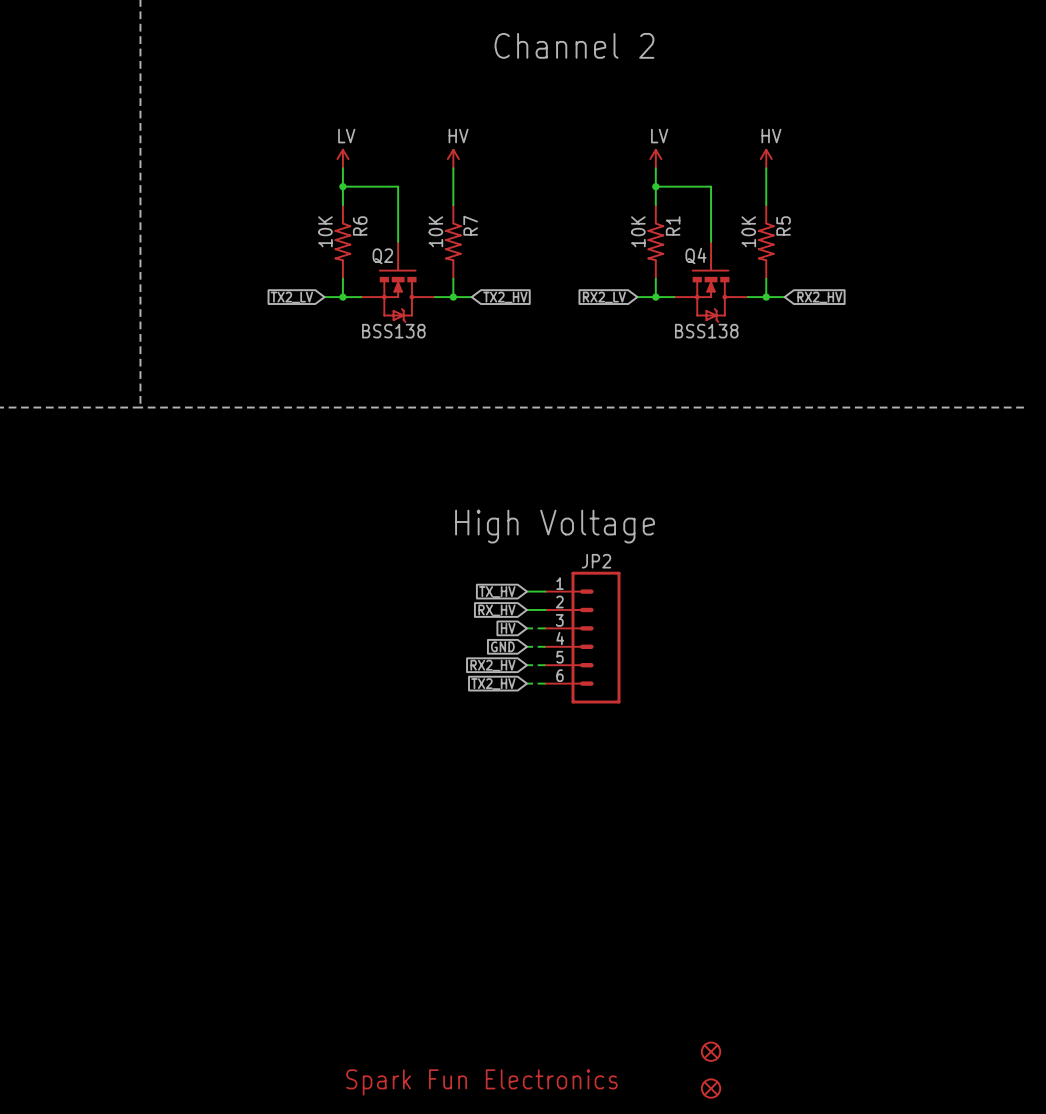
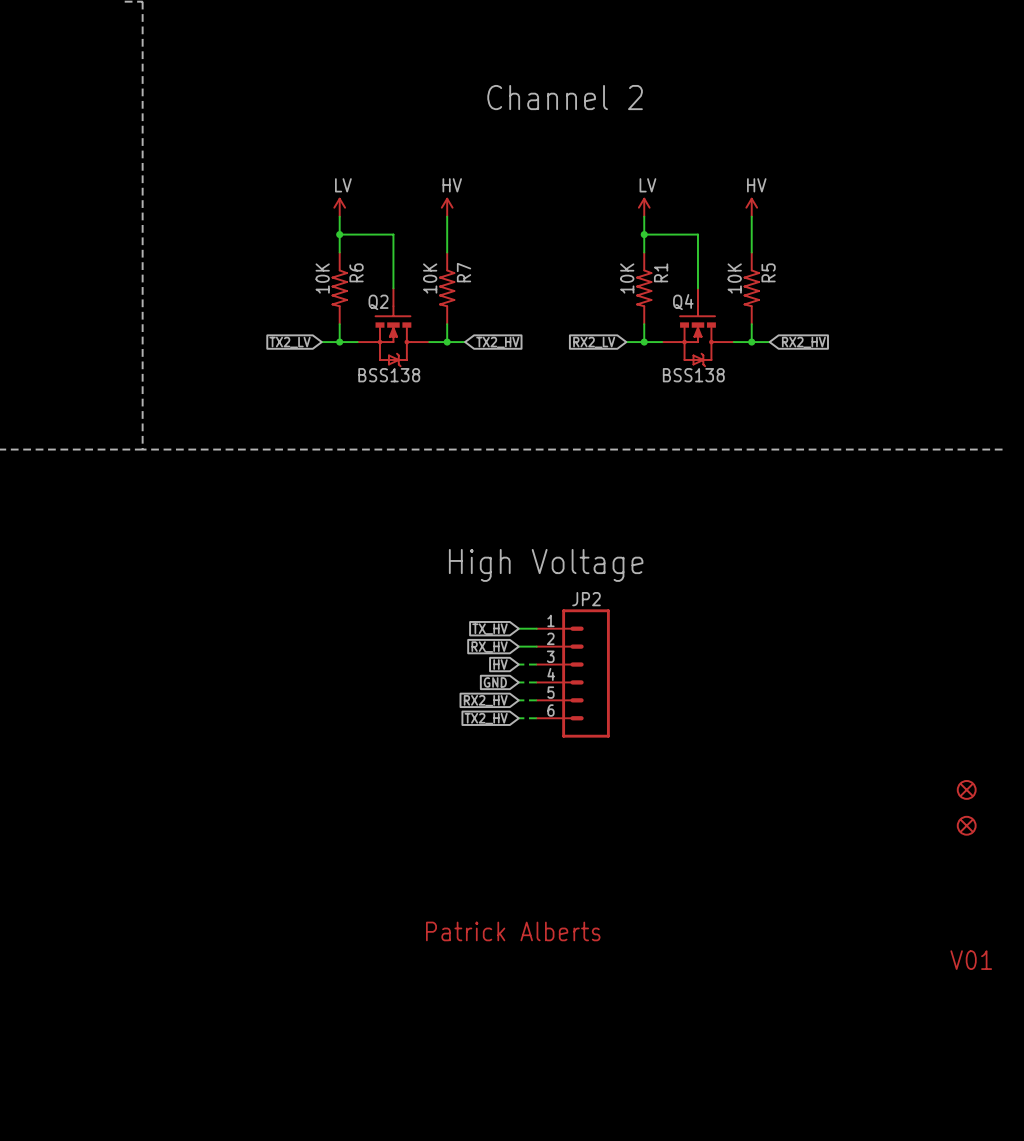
part: none -> (966, 789)
part: none -> (966, 825)
text: none -> Patrick Alberts (513, 931)
text: none -> V01 (971, 960)
part: (711, 1051) -> none
text: Spark Fun Electronics (481, 1082) -> none
part: (711, 1088) -> none

